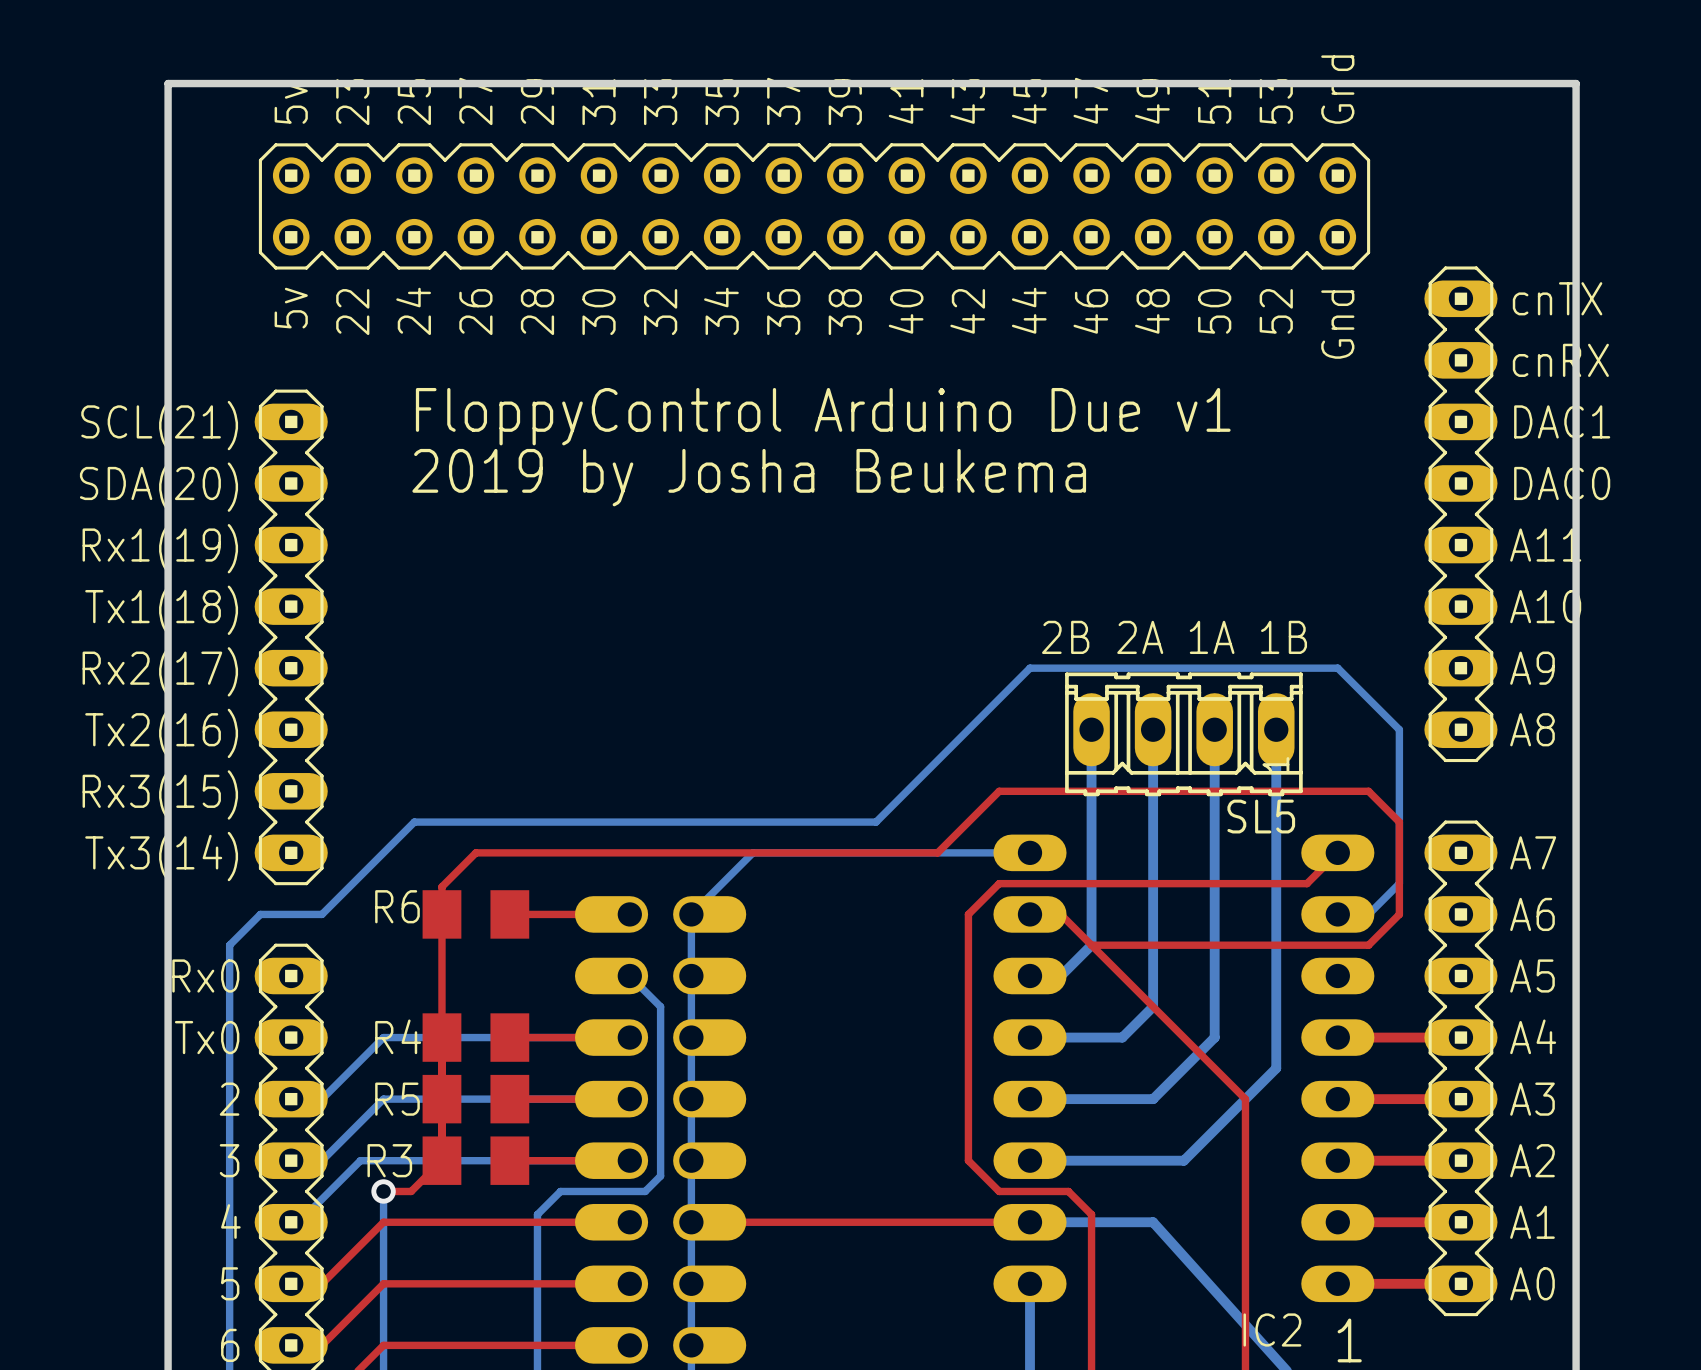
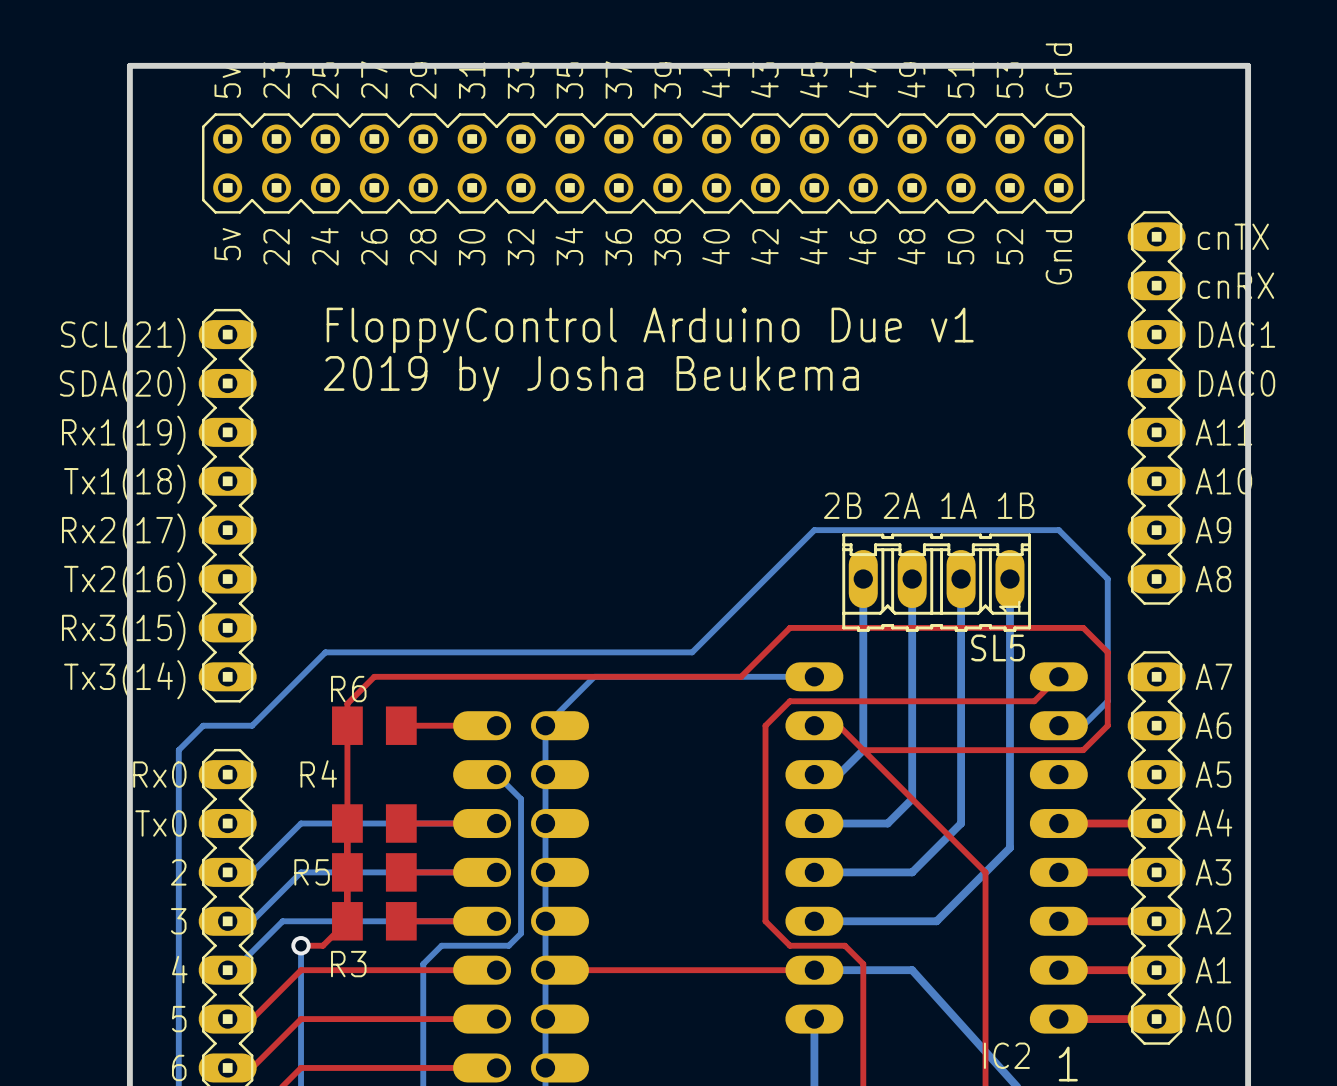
R6 name position: R6 (397, 906) -> R6 (348, 689)
R4 name position: R4 (398, 1036) -> R4 (318, 774)
R3 name position: R3 (389, 1160) -> R3 (348, 964)

